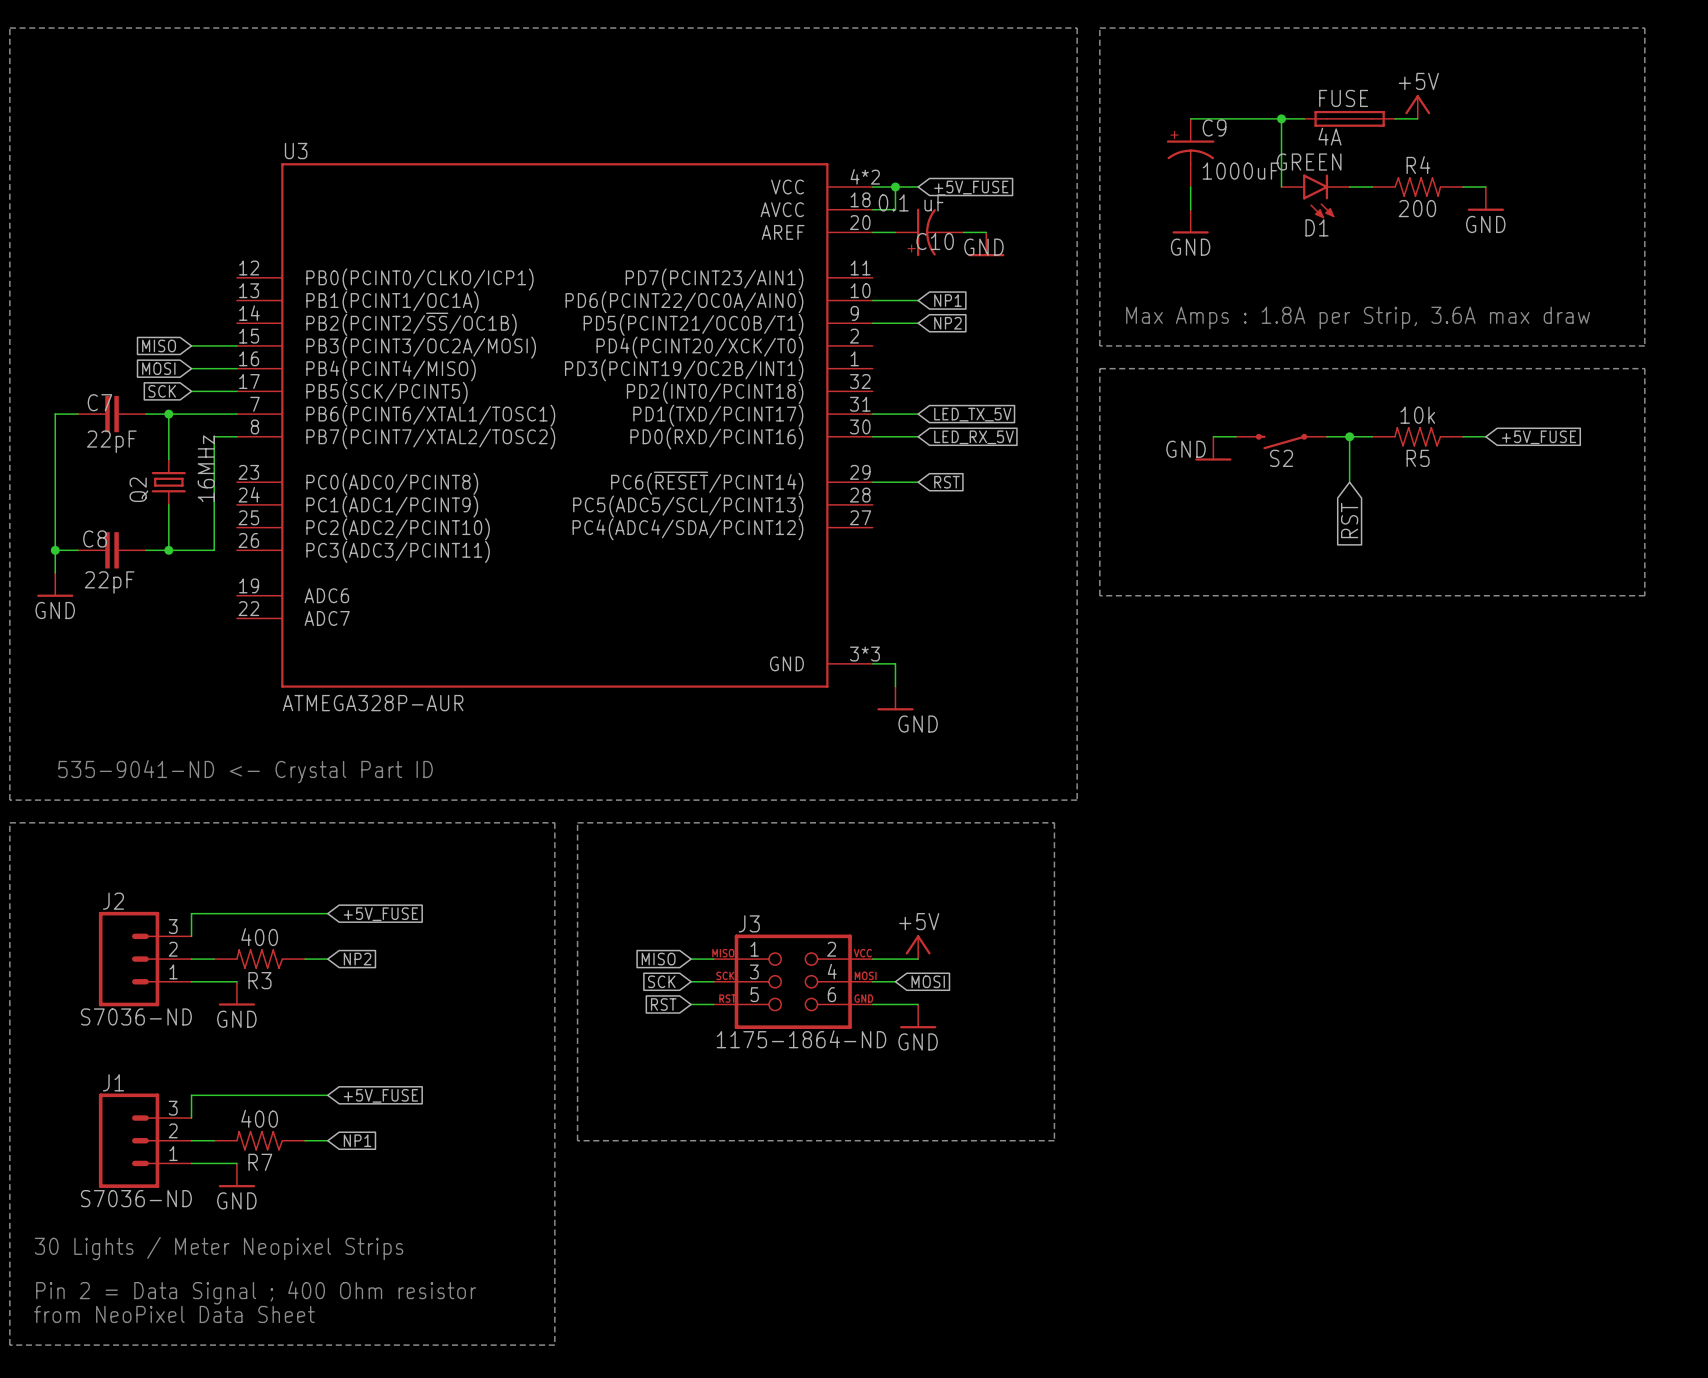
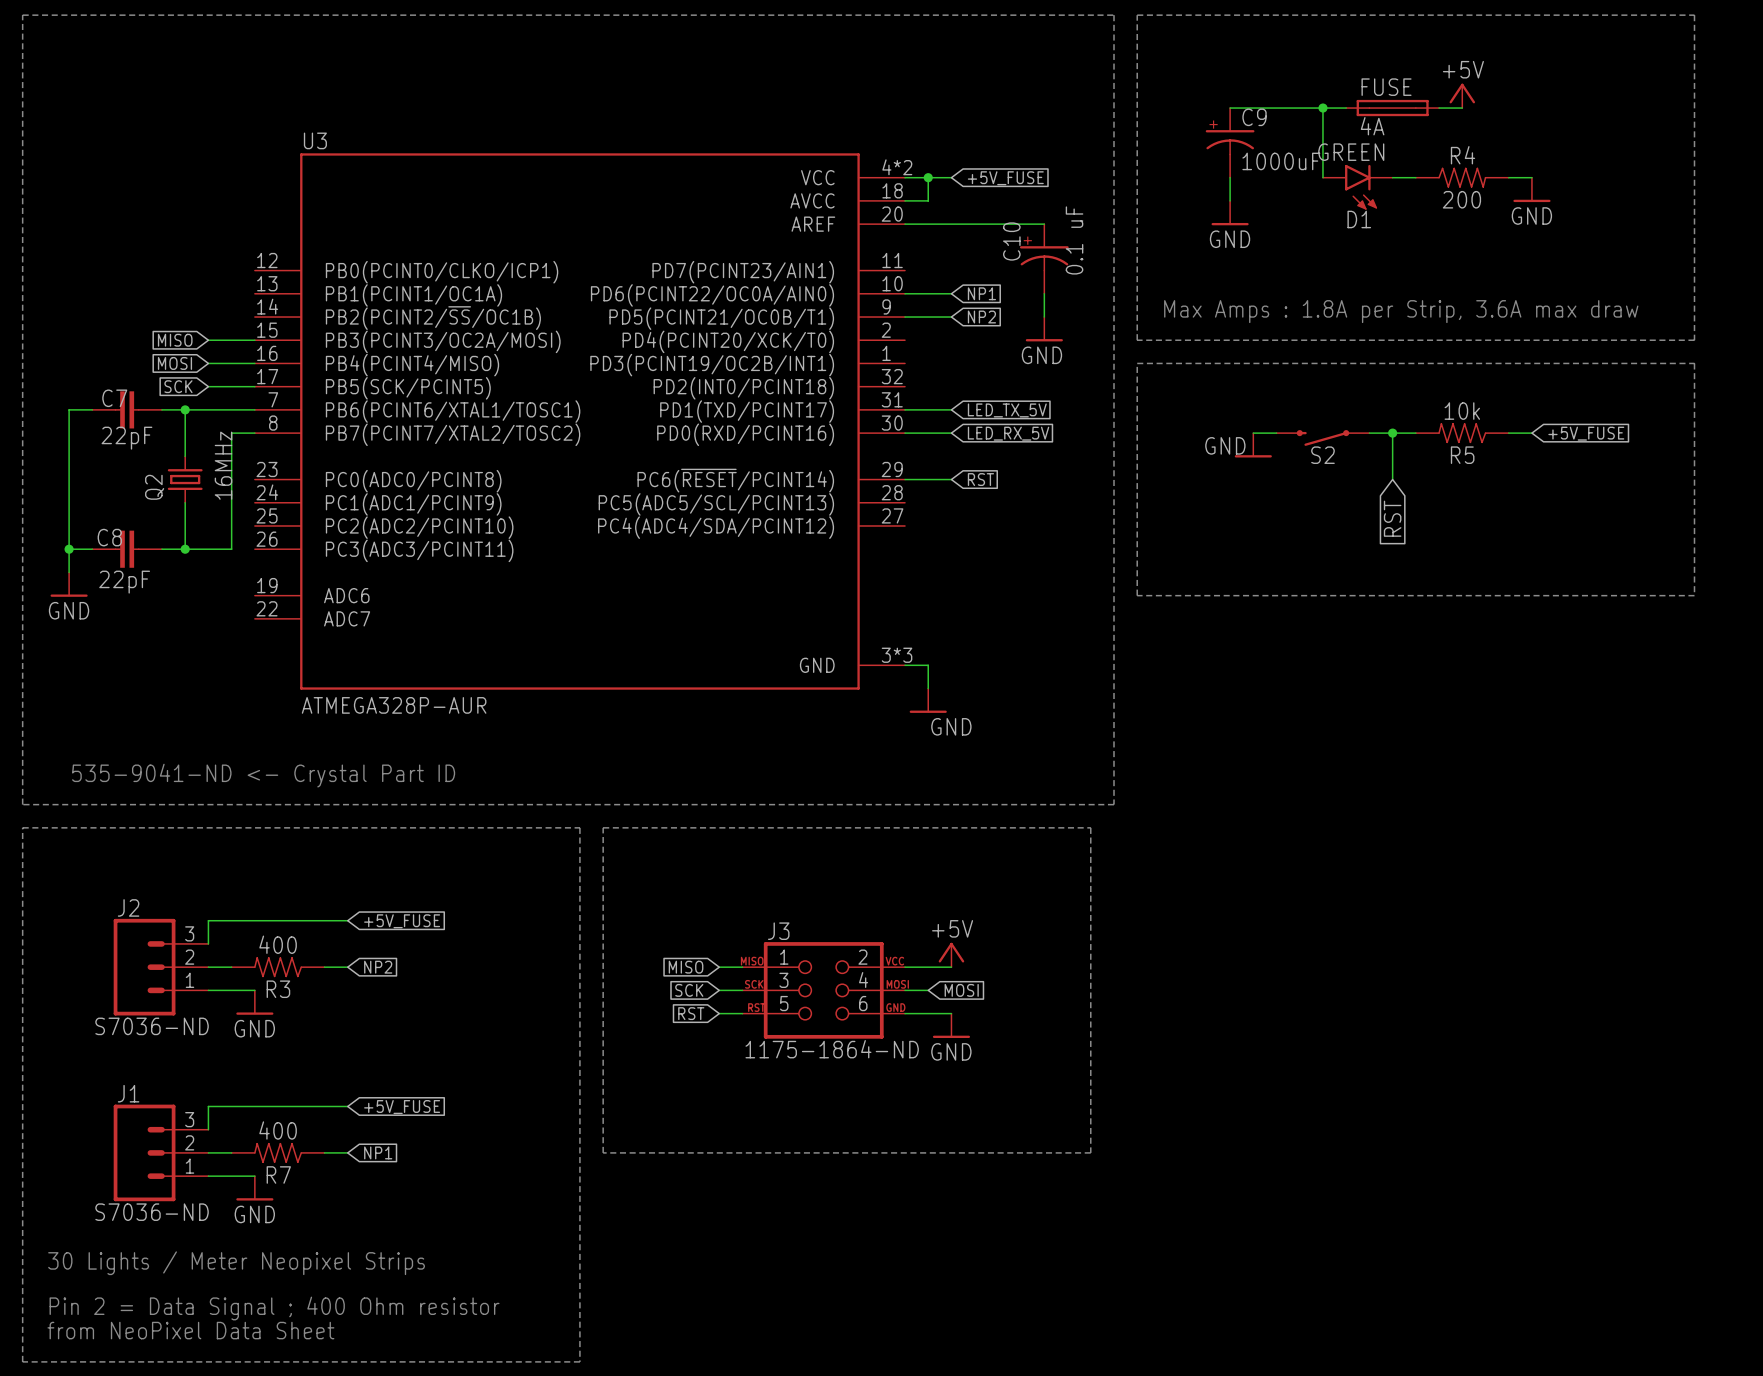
C10 rotation: 0° (924, 232) -> 90° clockwise (1044, 253)
C10 position: (929, 232) -> (1044, 258)
wire: none -> (1021, 224) (1044, 224)
C10 name position: C10 (935, 241) -> C10 (1011, 241)
power symbol position: GND (986, 244) -> GND (1044, 329)
power symbol text position: GND (983, 247) -> GND (1041, 355)
wire: none -> (1044, 293) (1044, 317)

